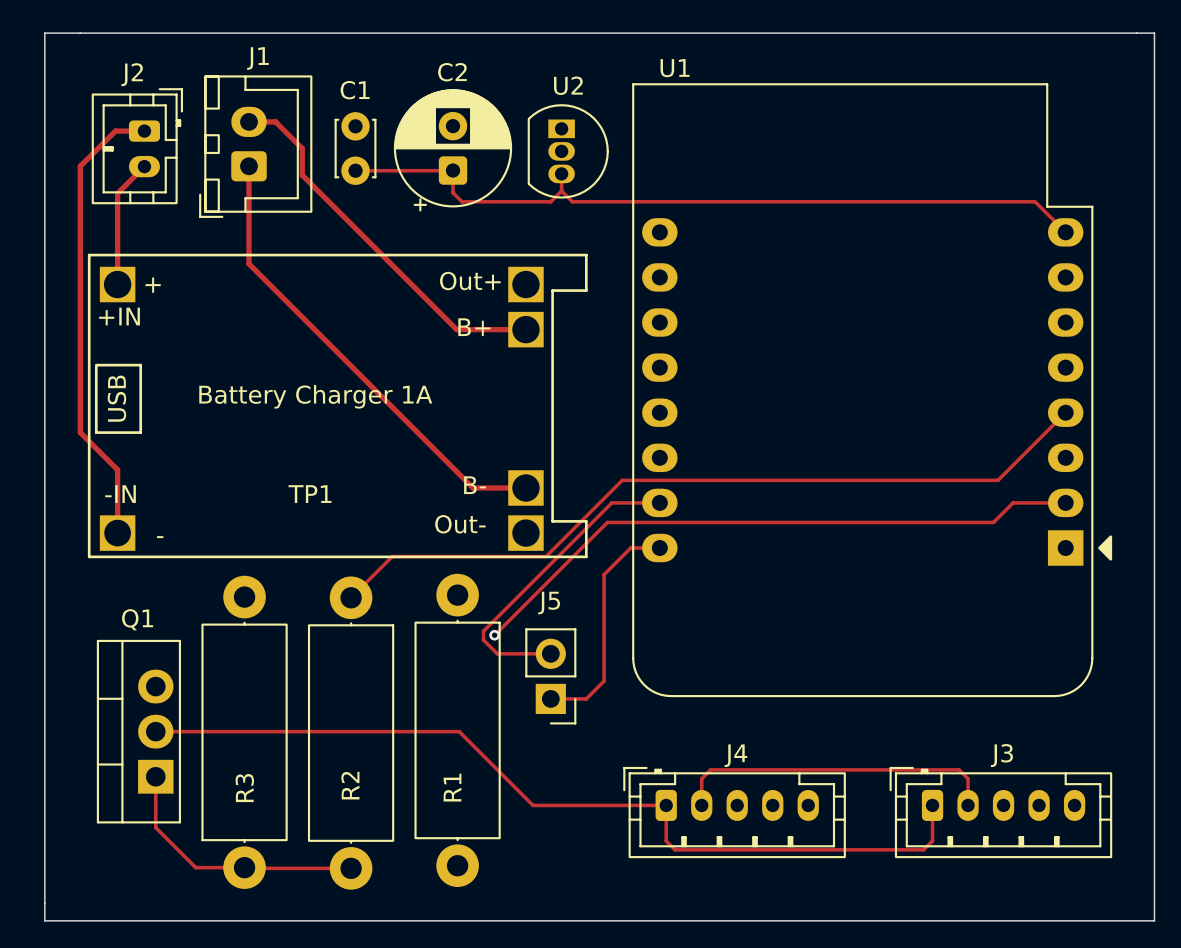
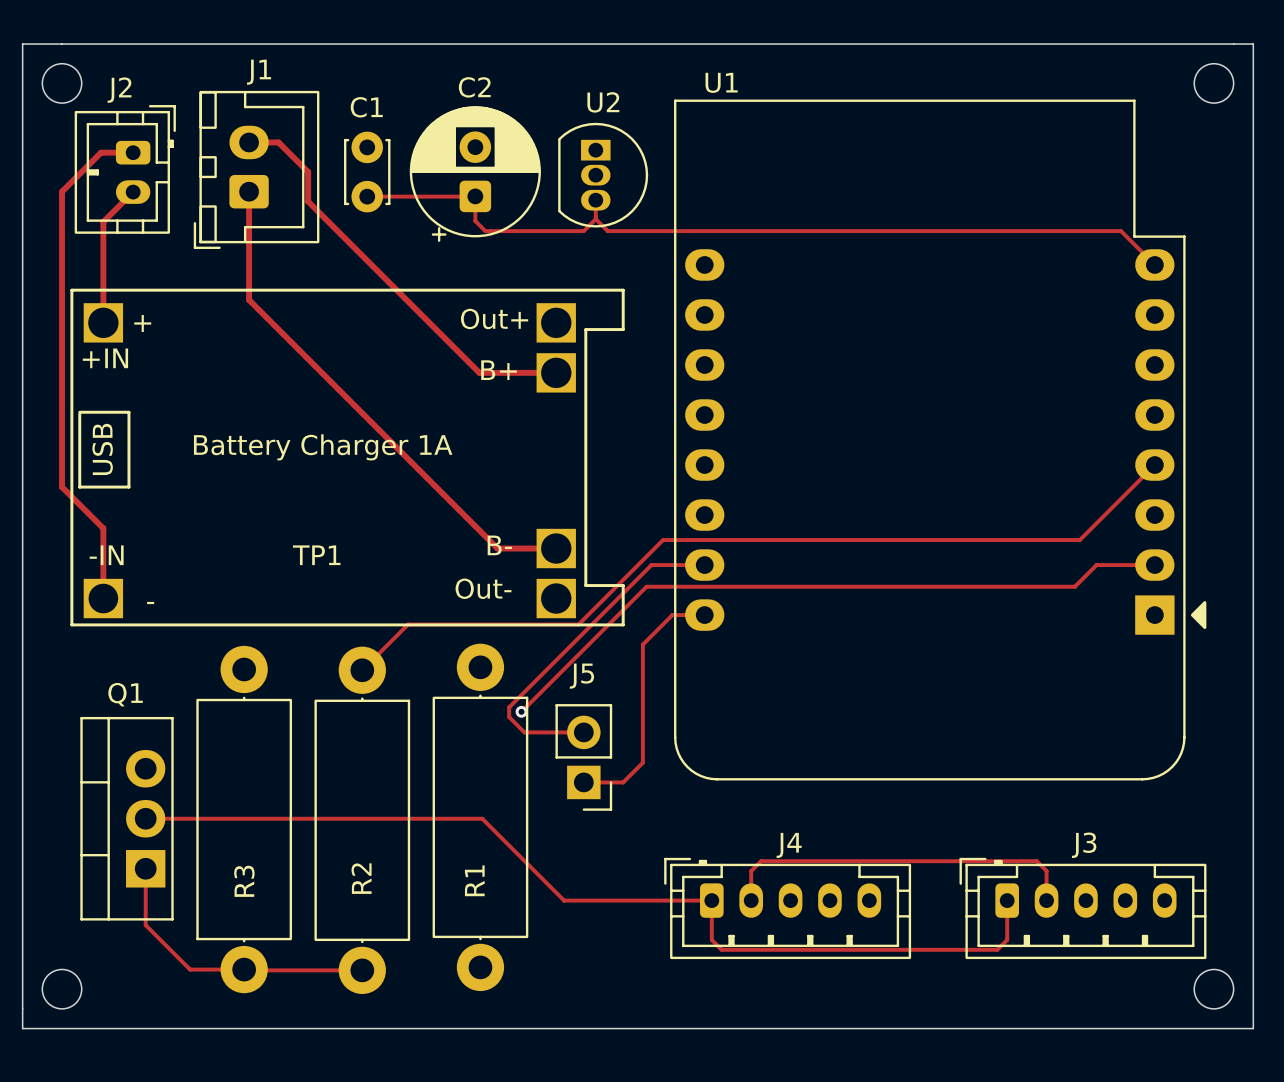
round board edge: none -> [41, 63, 83, 104]
round board edge: none -> [1193, 63, 1235, 104]
round board edge: none -> [41, 969, 83, 1010]
round board edge: none -> [1193, 969, 1235, 1010]

